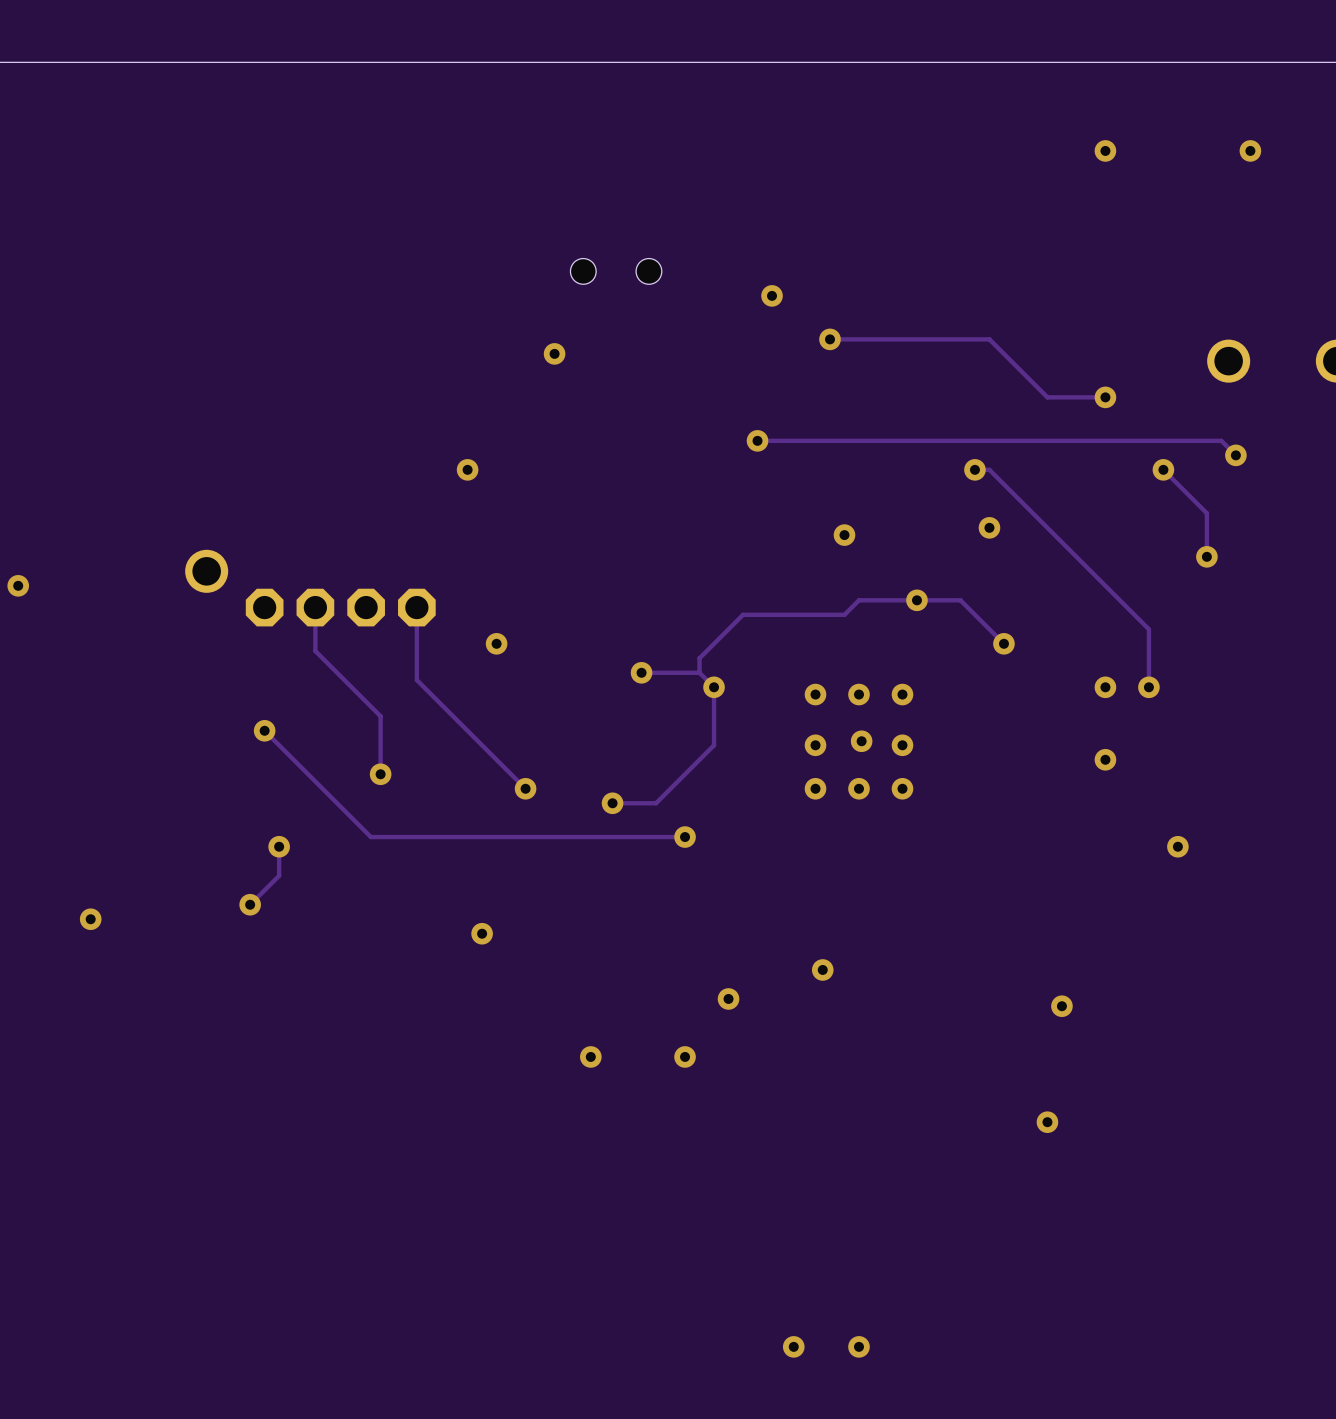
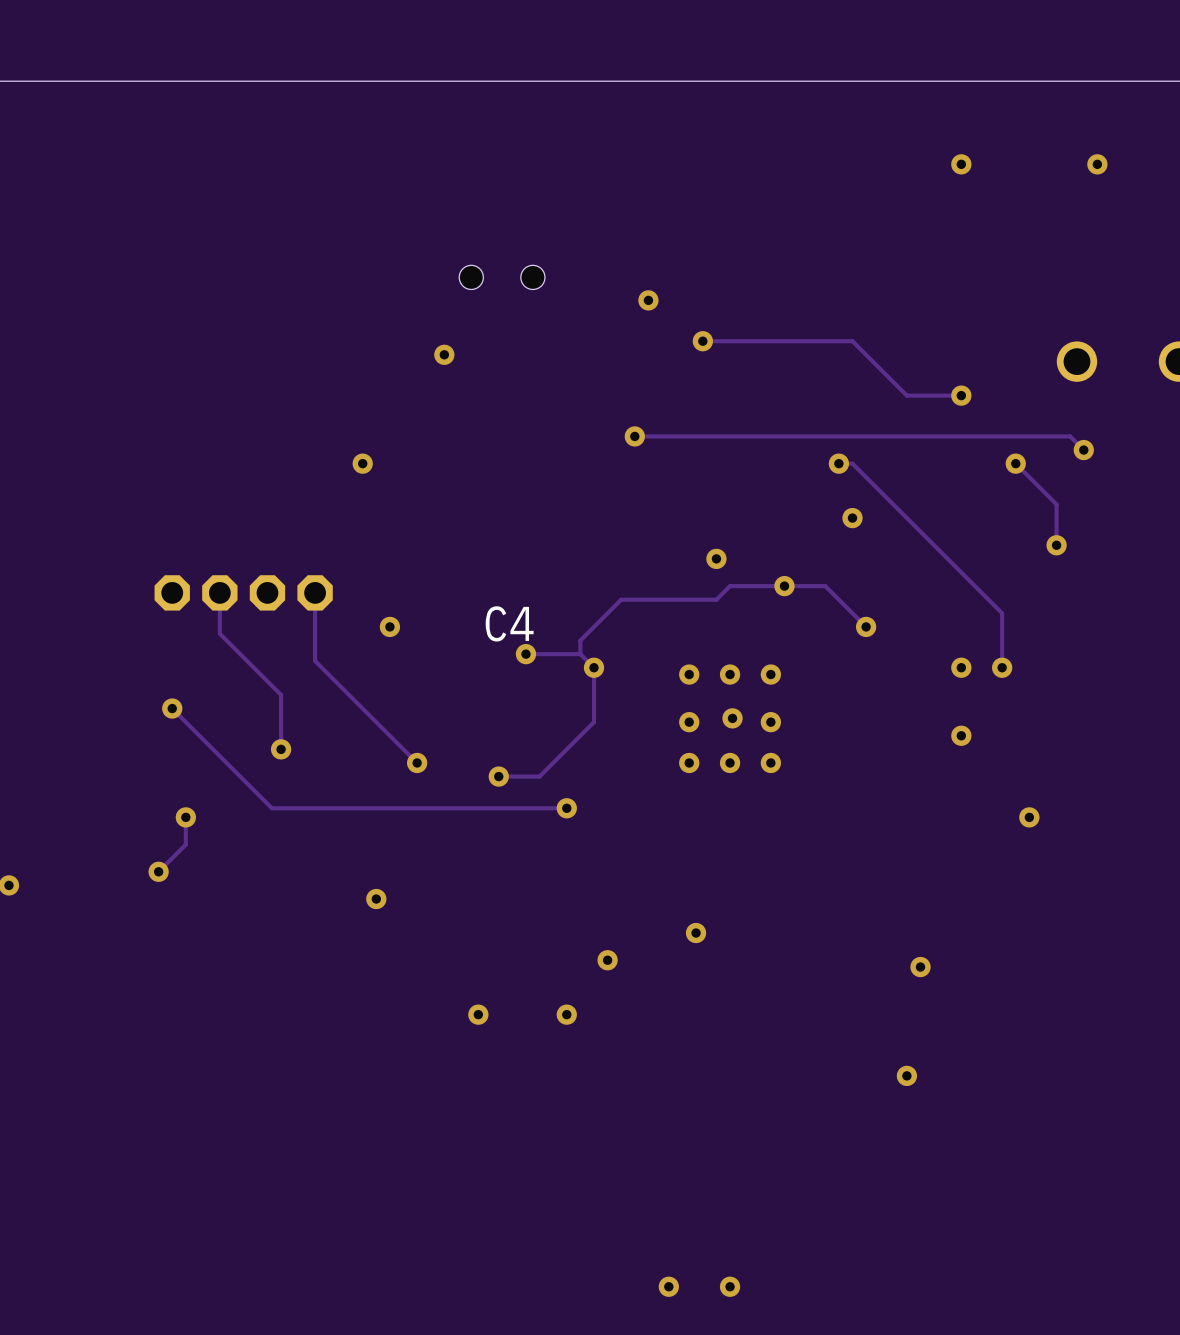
via position: (844, 535) -> (716, 558)
part: (206, 571) -> none
C4: none -> (509, 623)

